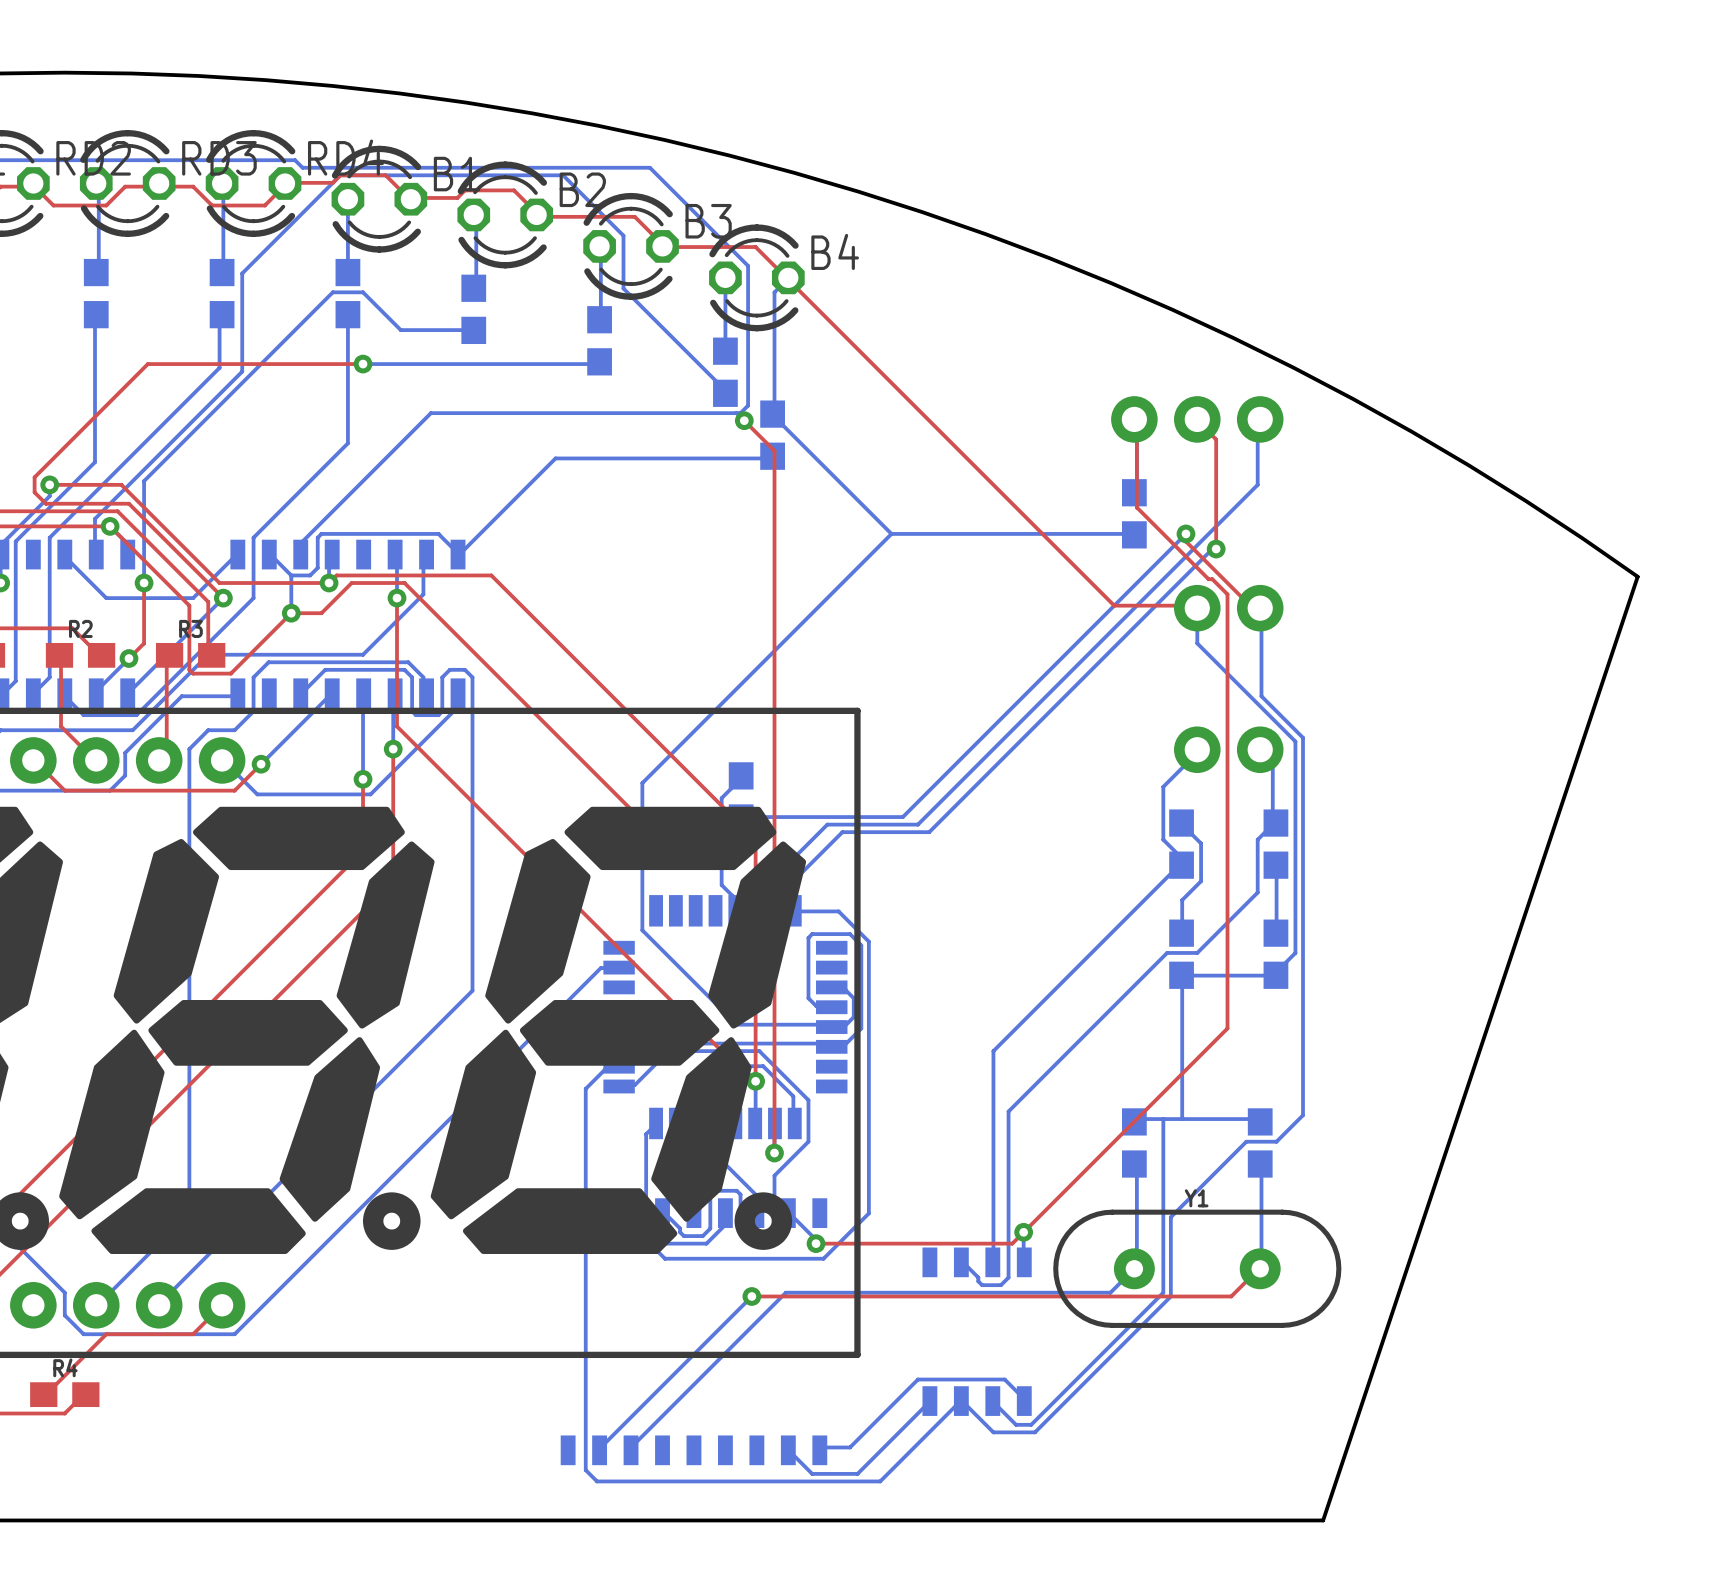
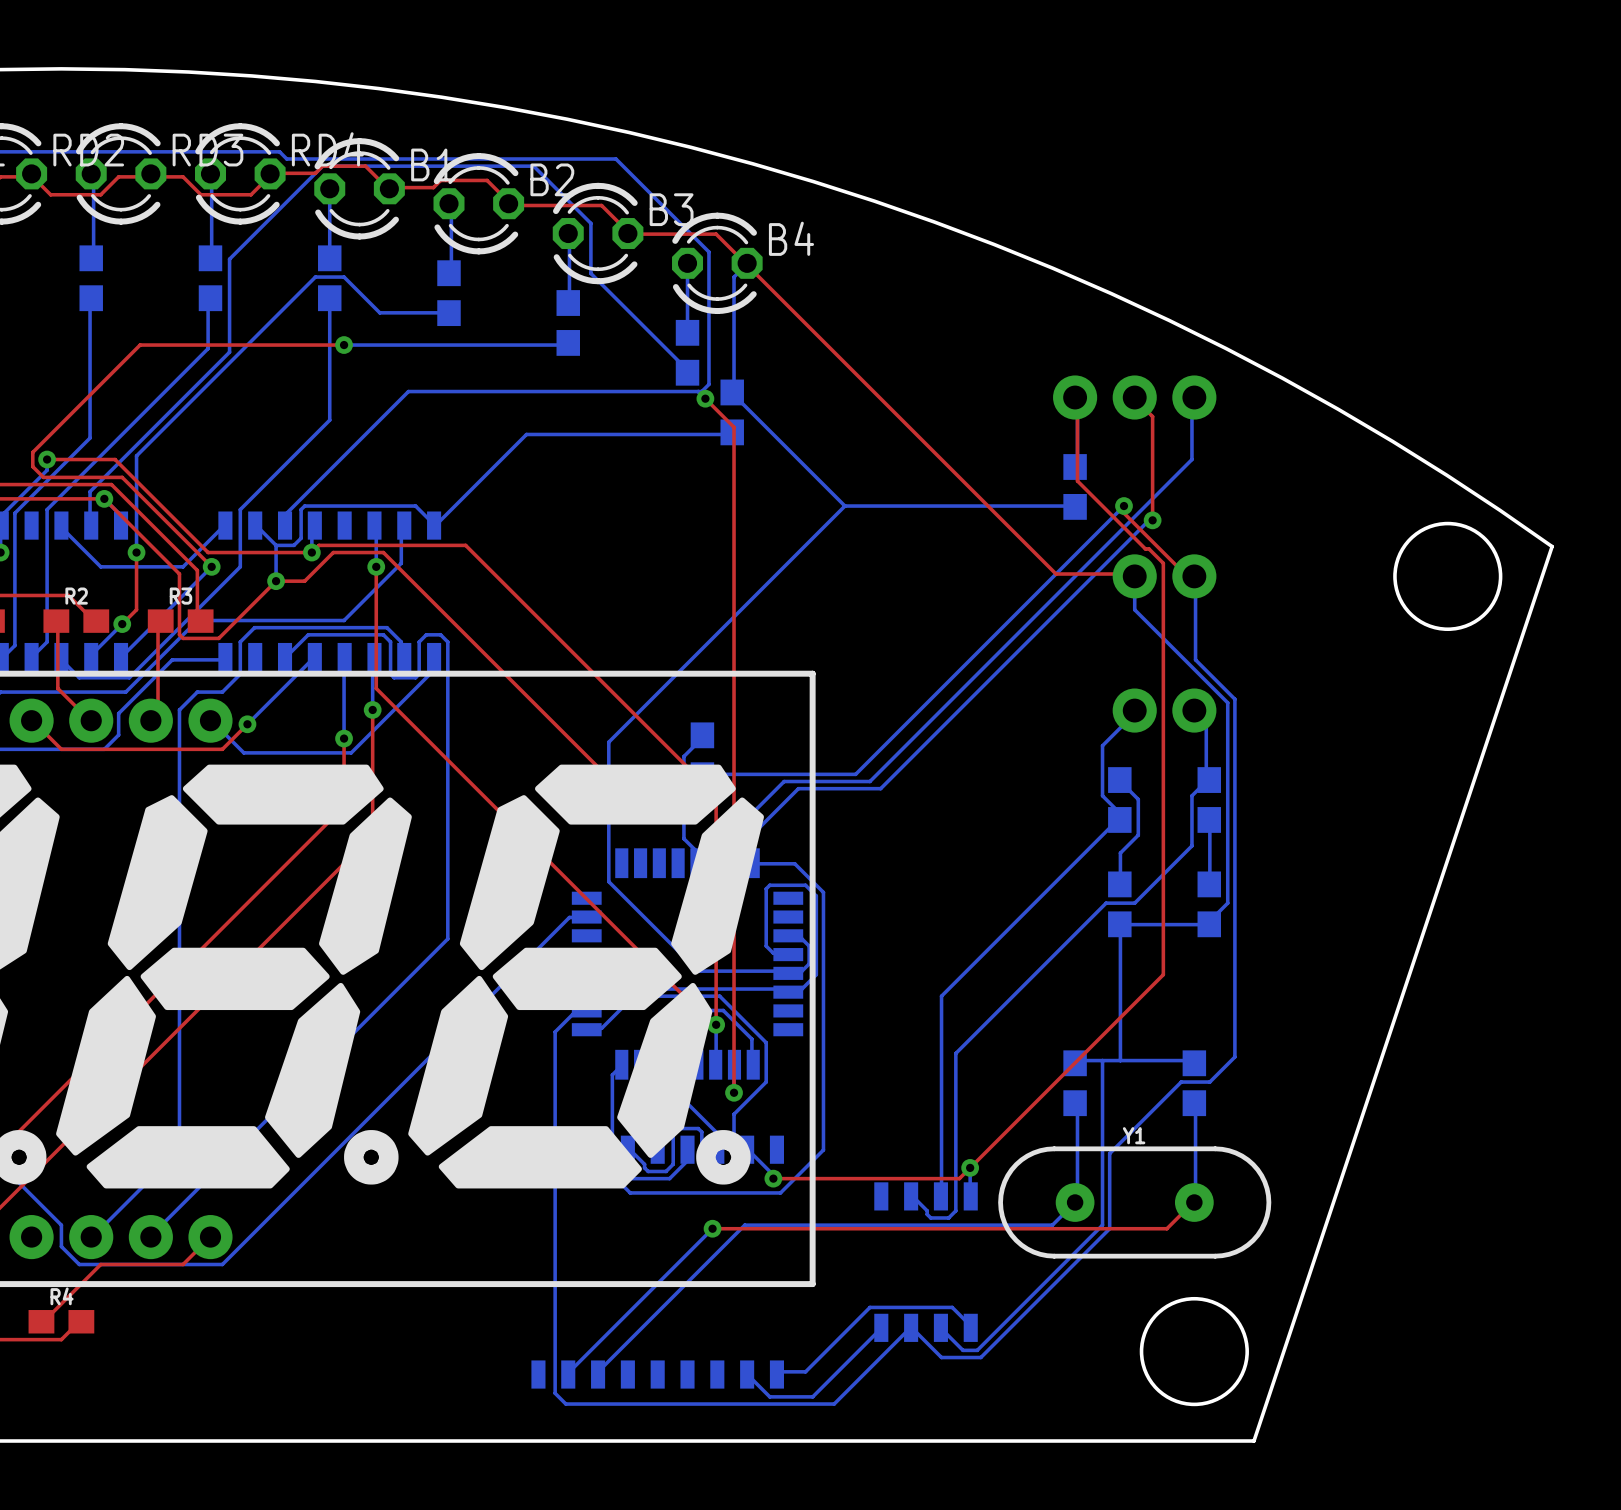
round board edge: none -> [1393, 521, 1503, 632]
round board edge: none -> [1139, 1296, 1249, 1407]

